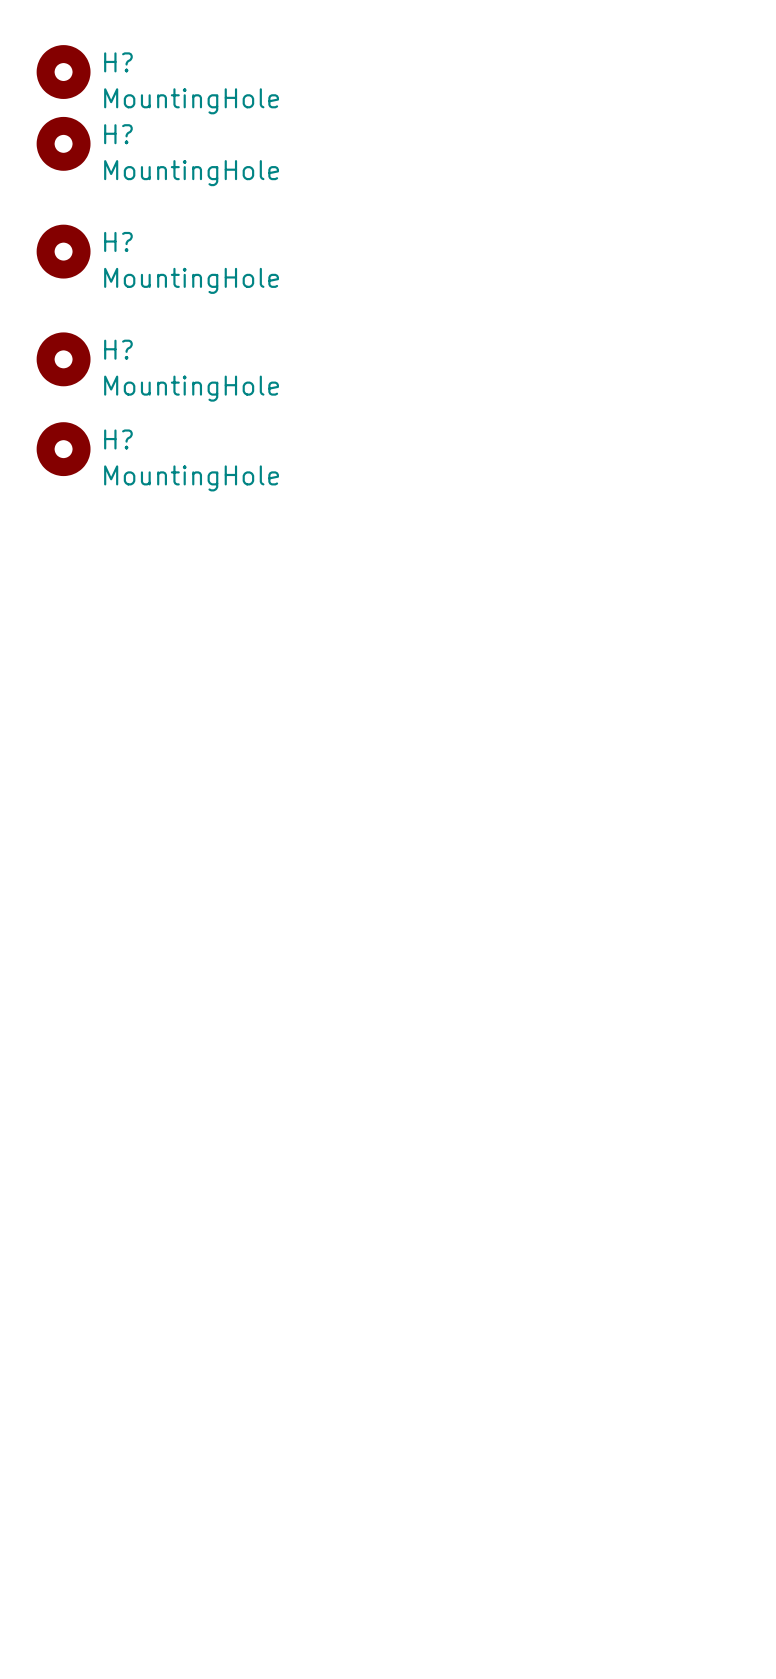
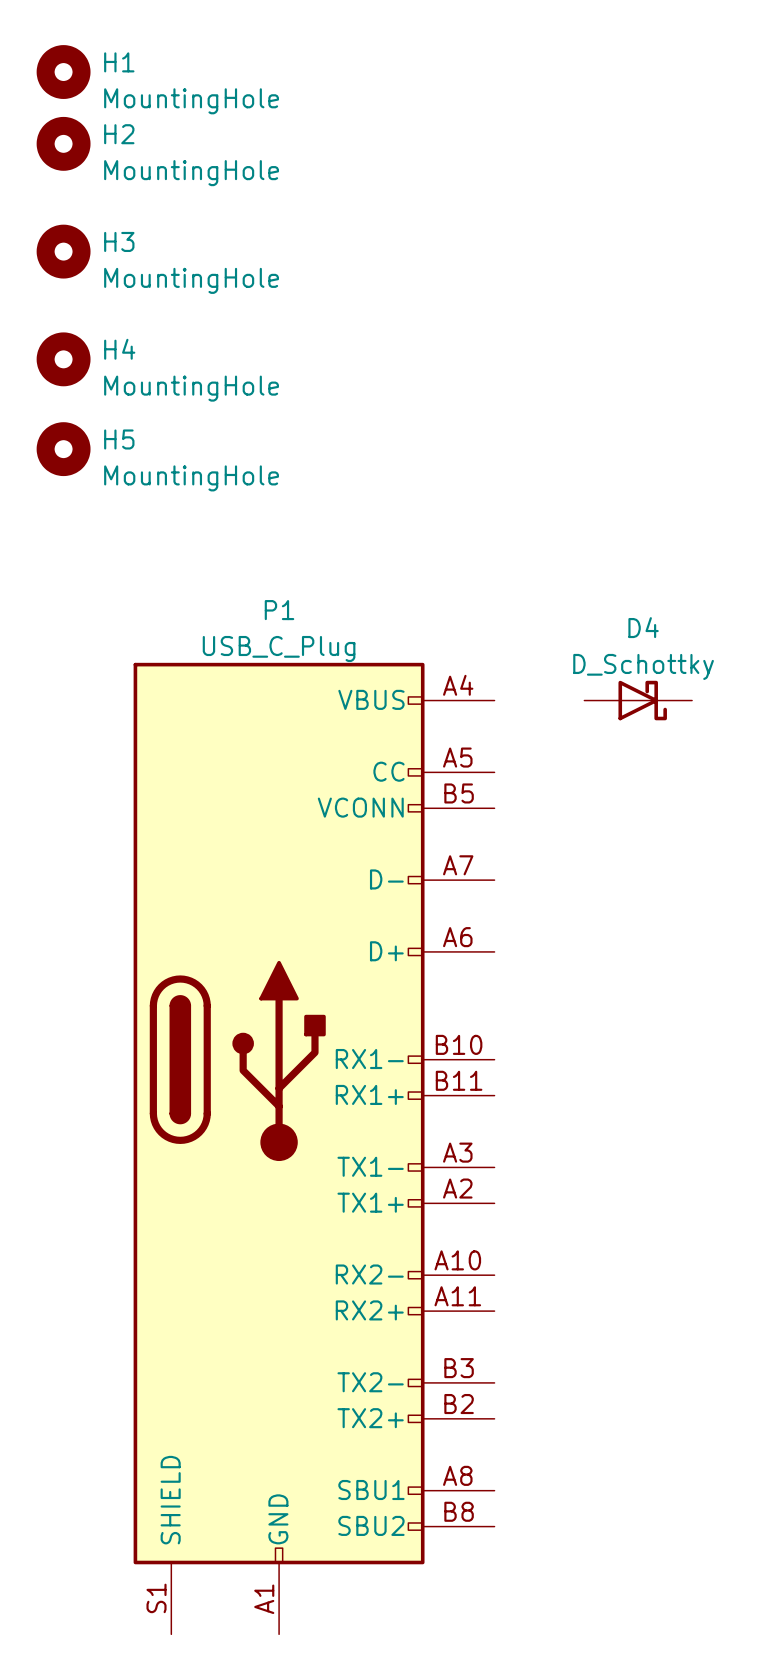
H? name: H? (118, 62) -> H1 (119, 62)
H? name: H? (118, 134) -> H2 (119, 134)
H? name: H? (118, 241) -> H3 (119, 241)
H? name: H? (118, 349) -> H4 (119, 349)
H? name: H? (118, 439) -> H5 (119, 439)
D4: none -> D_Schottky (638, 700)
P1: none -> USB_C_Plug (314, 1148)

